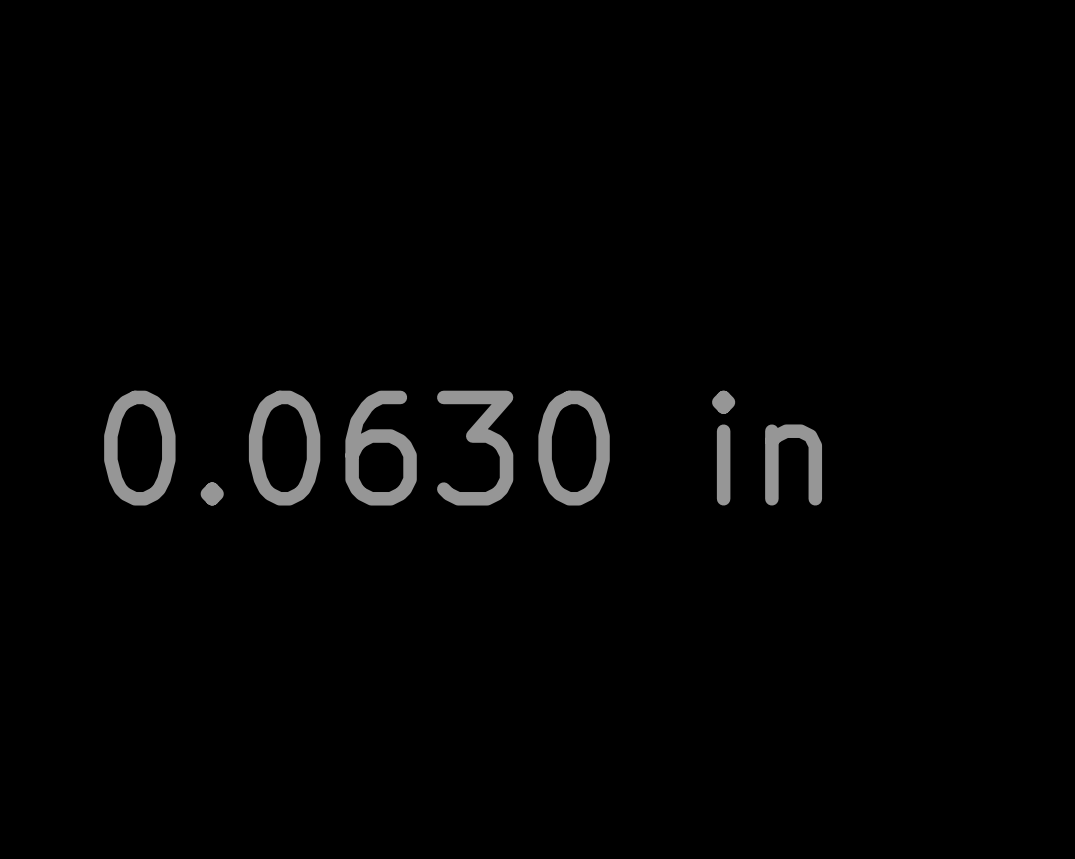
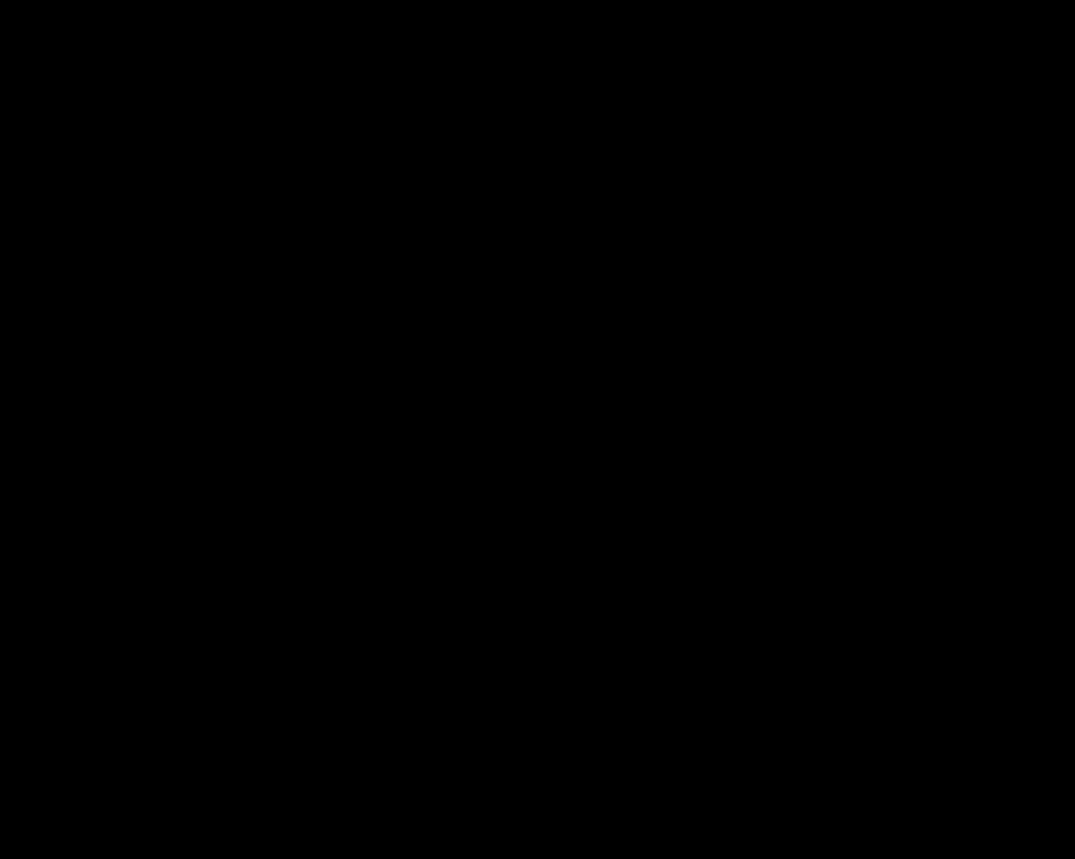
text: 0.0630 in (463, 448) -> none

